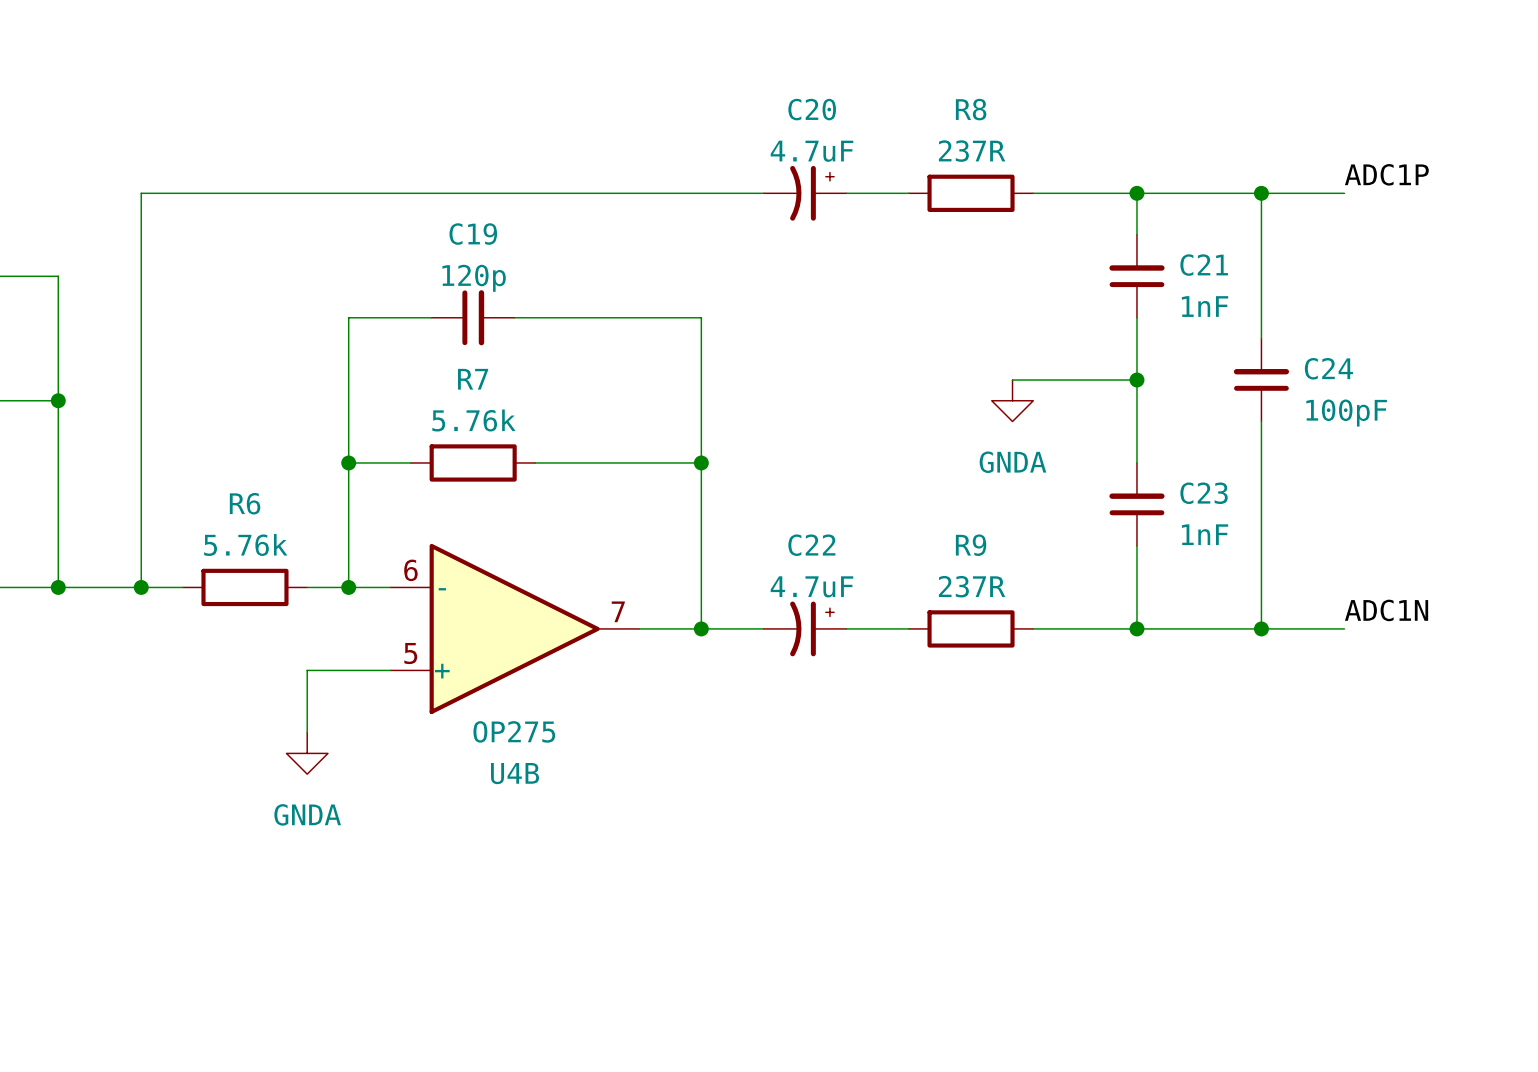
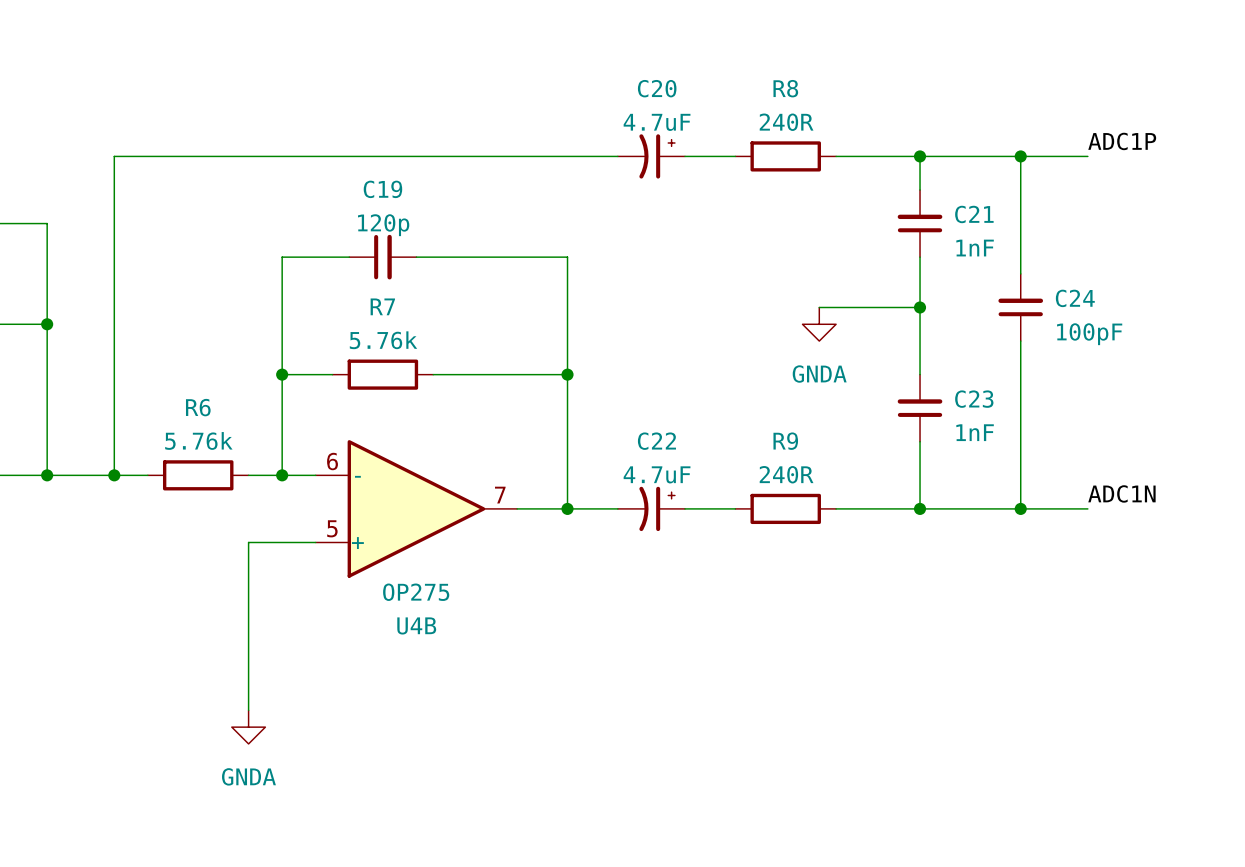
R8 value: 237R (972, 151) -> 240R (786, 122)
R9 value: 237R (972, 586) -> 240R (786, 474)
wire: none -> (248, 592) (248, 710)
power symbol position: GNDA (307, 753) -> GNDA (248, 727)

